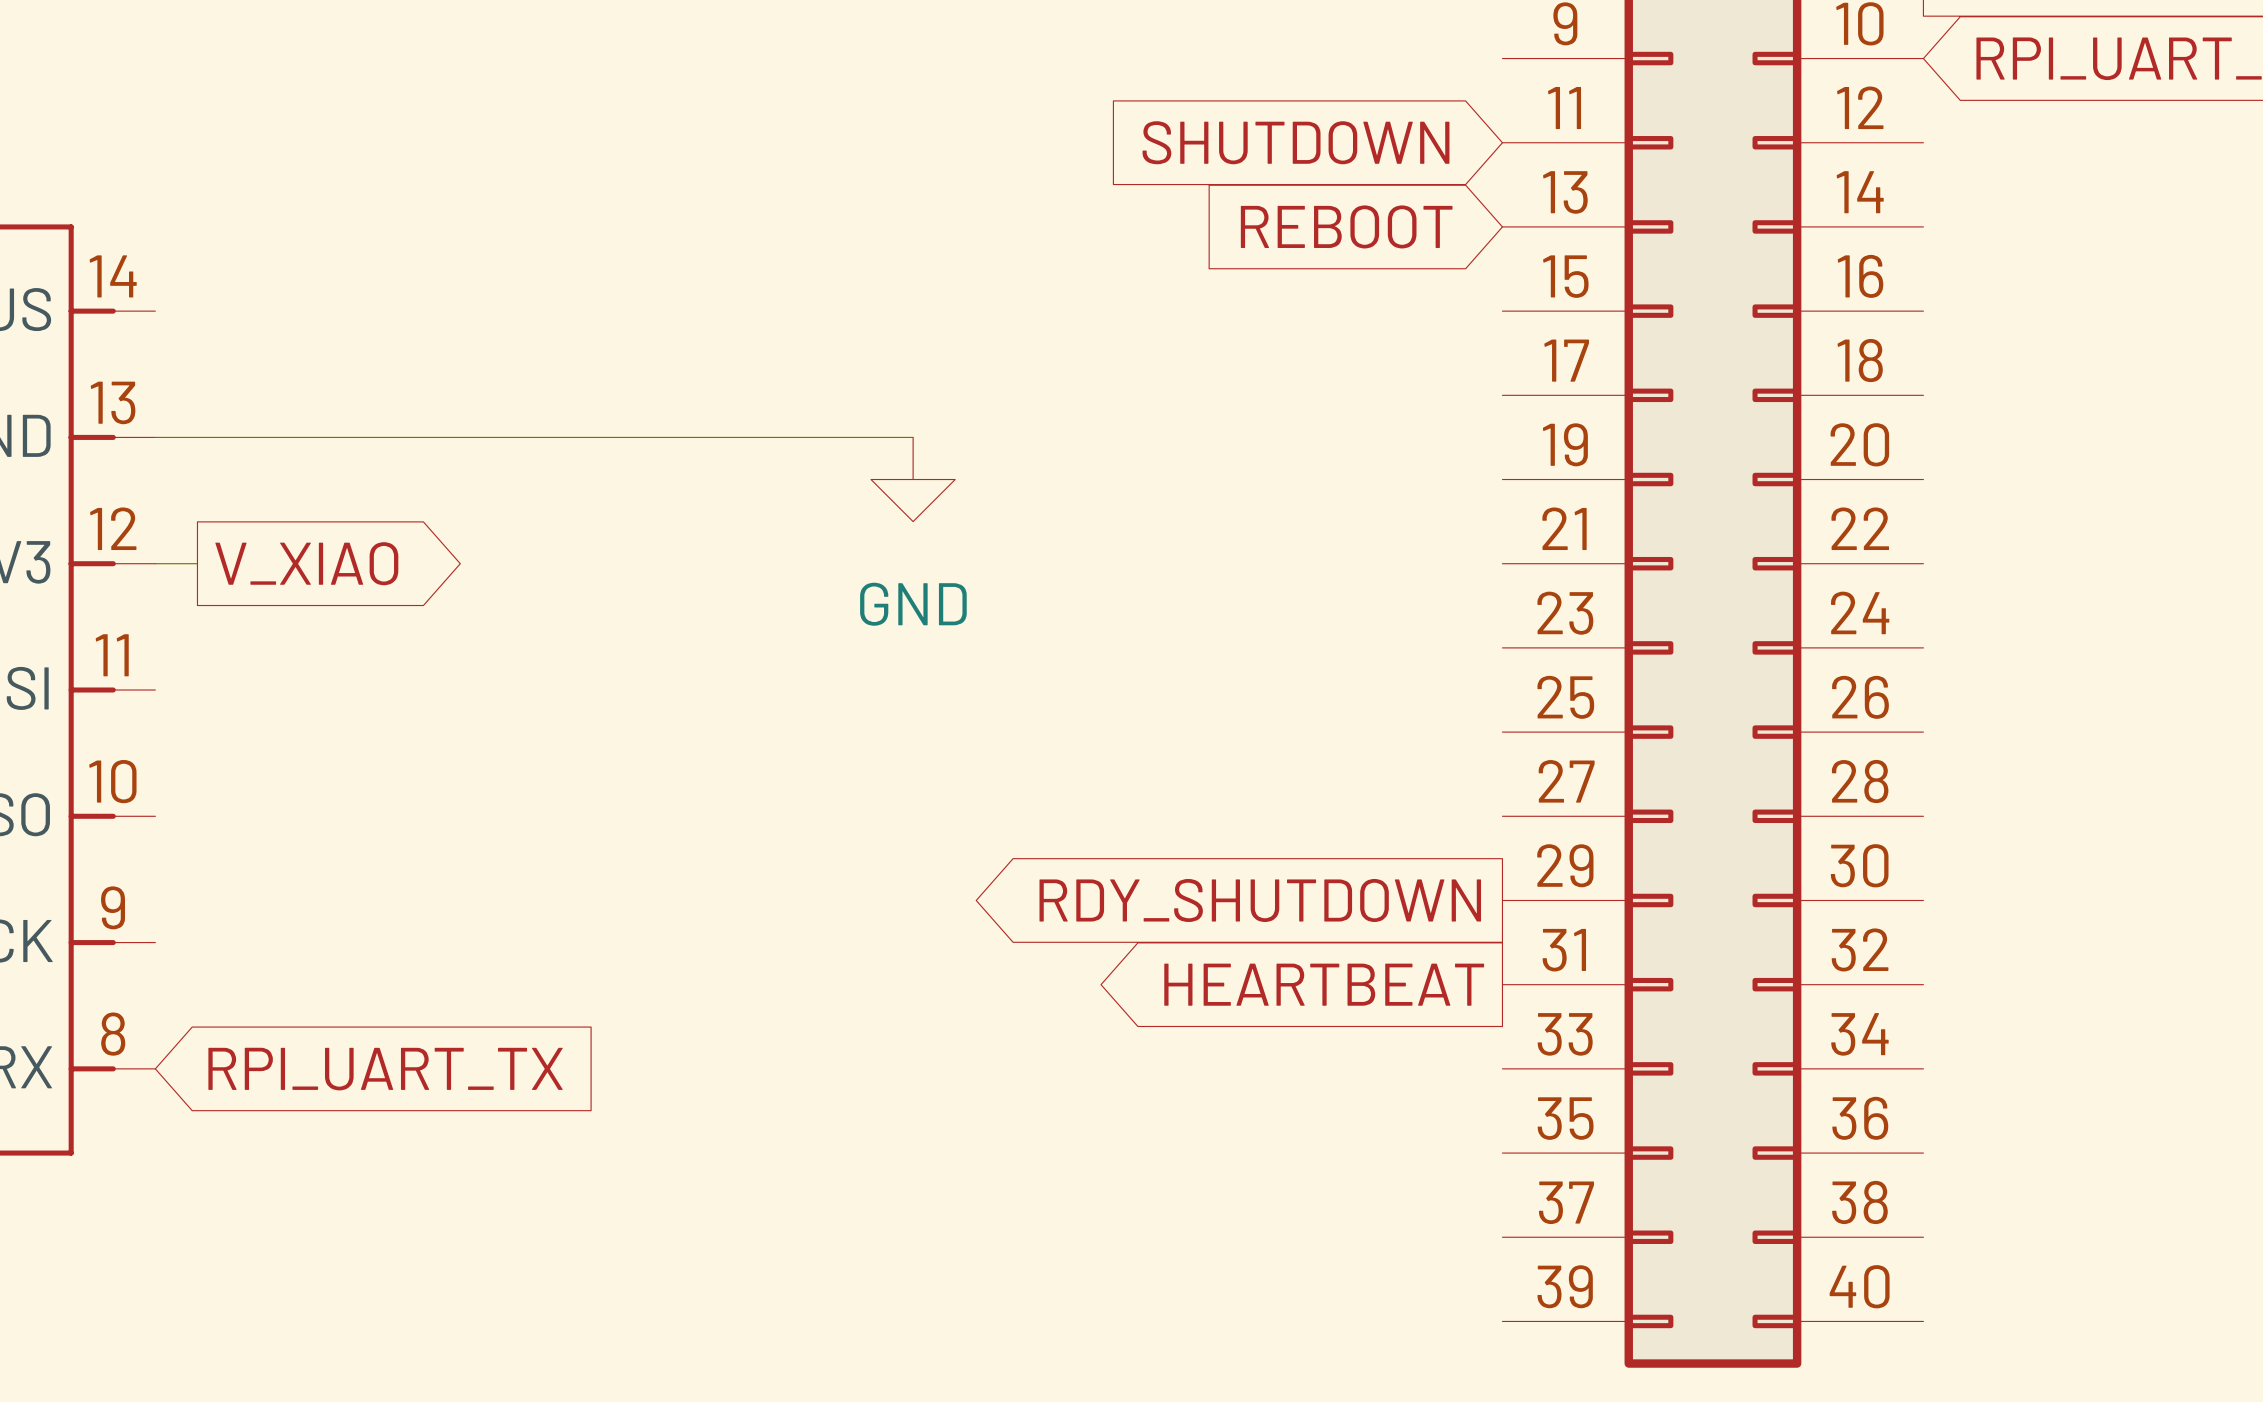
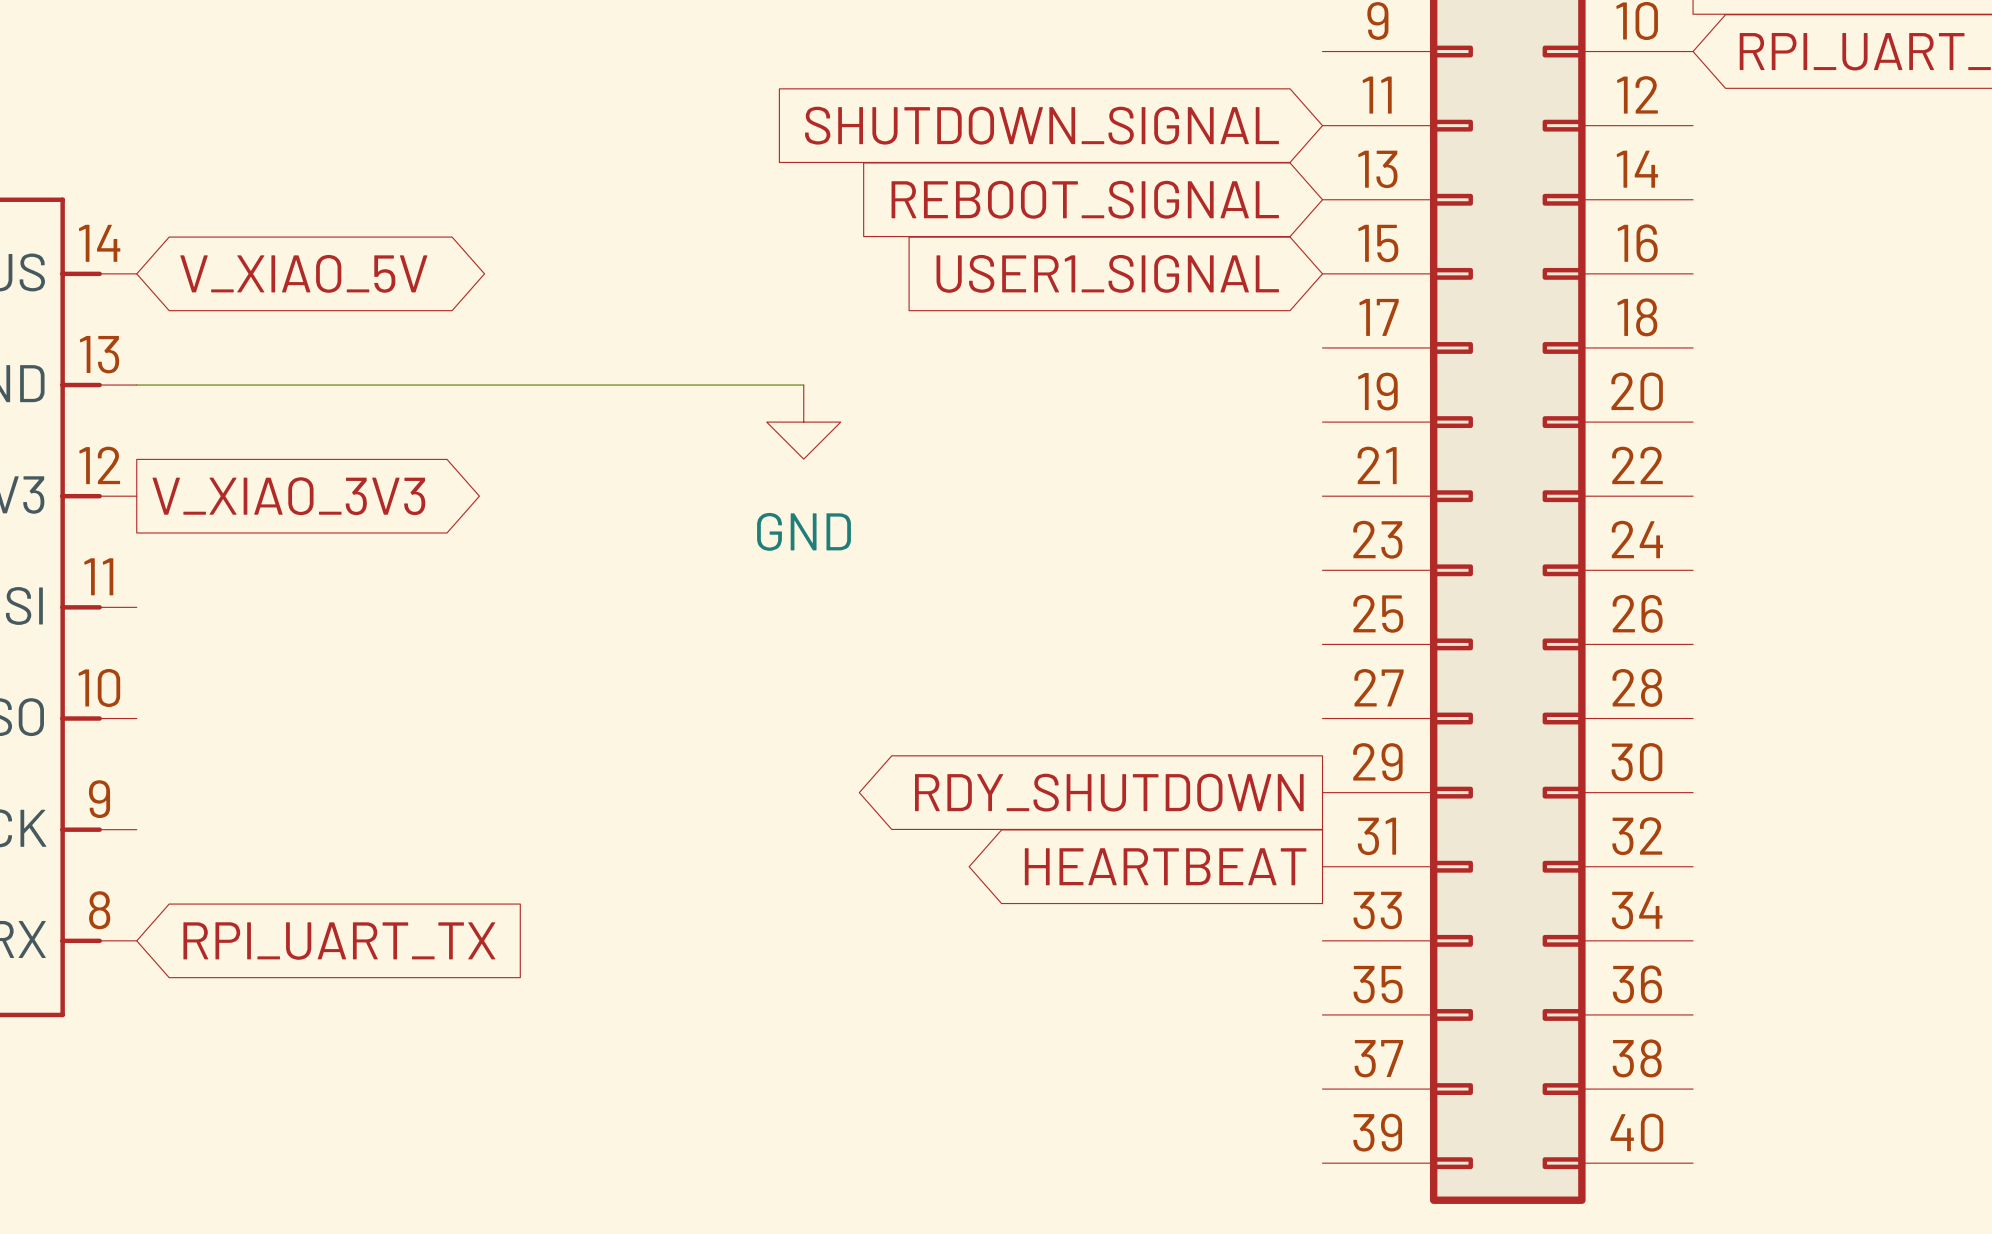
global label: SHUTDOWN (1296, 142) -> SHUTDOWN_SIGNAL (1041, 125)
global label: REBOOT (1346, 226) -> REBOOT_SIGNAL (1085, 199)
global label: none -> V_XIAO_5V (303, 273)
global label: none -> USER1_SIGNAL (1107, 273)
wire: (155, 563) (197, 563) -> none
global label: V_XIAO (306, 563) -> V_XIAO_3V3 (288, 496)

